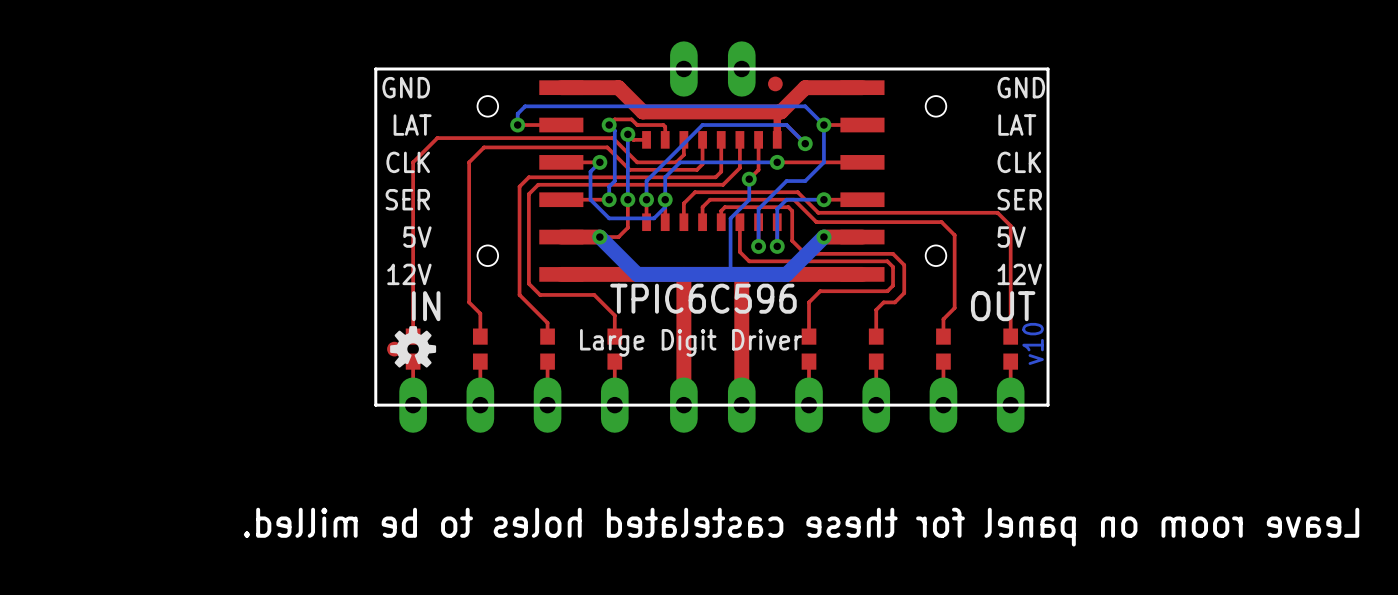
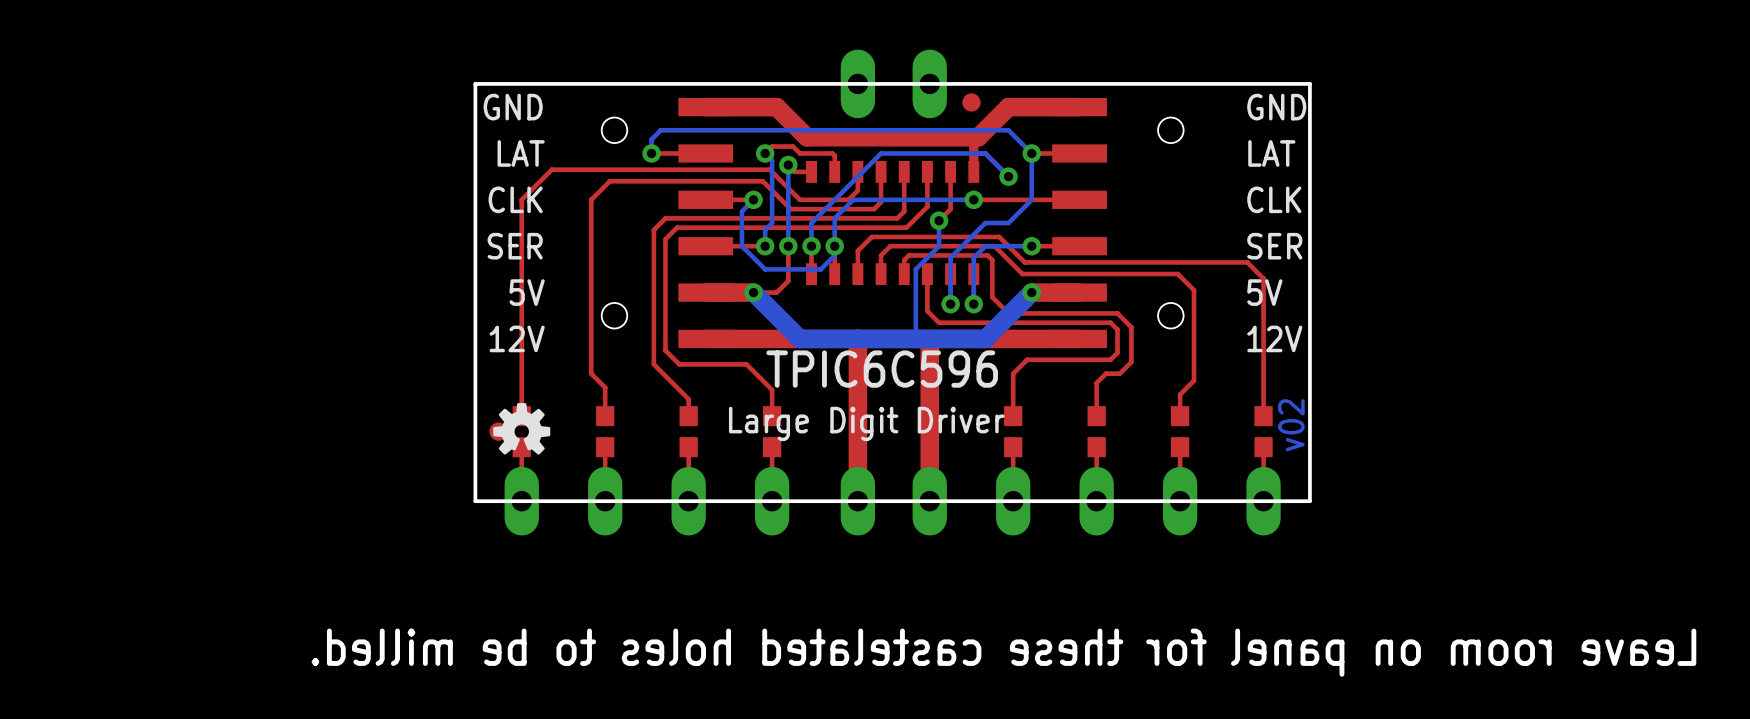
text: IN (426, 306) -> none
text: OUT (1003, 306) -> none
drawing shape: [1022, 322, 1044, 365] -> [1278, 399, 1305, 452]

